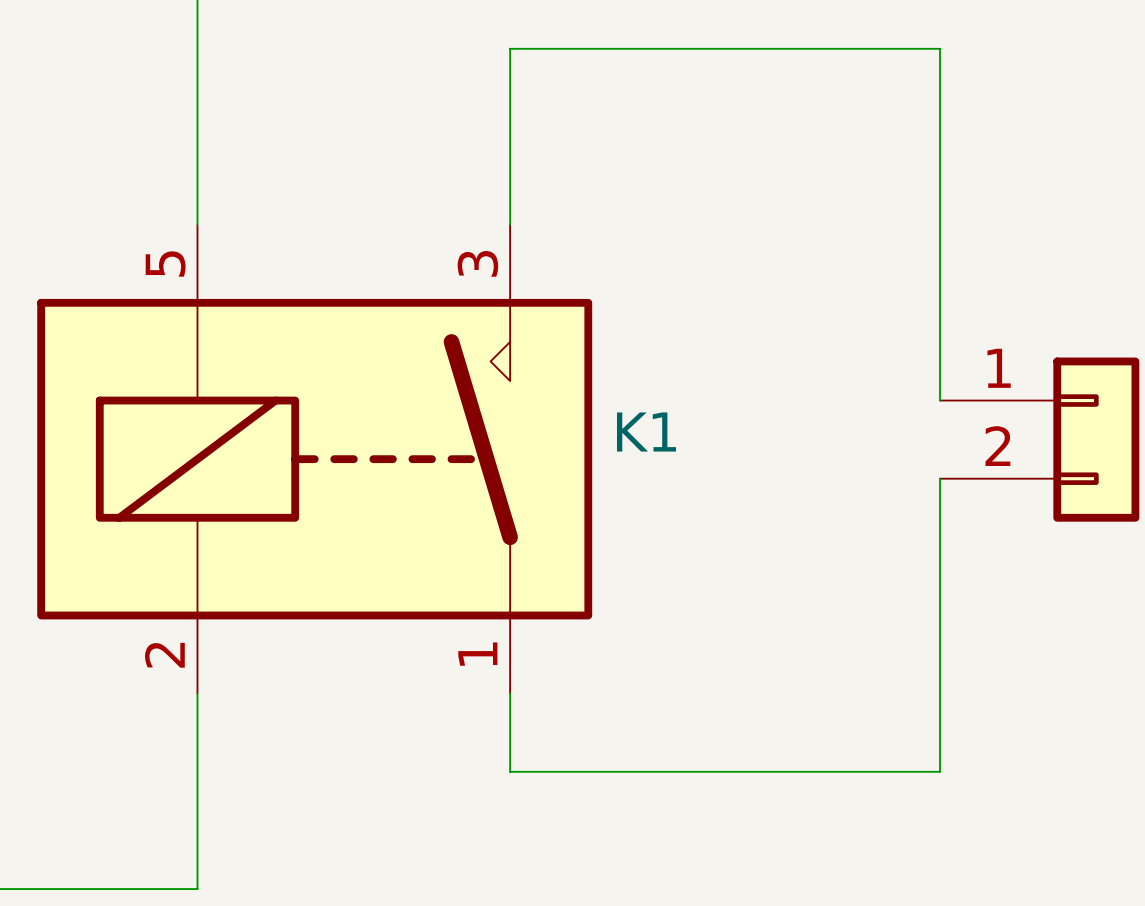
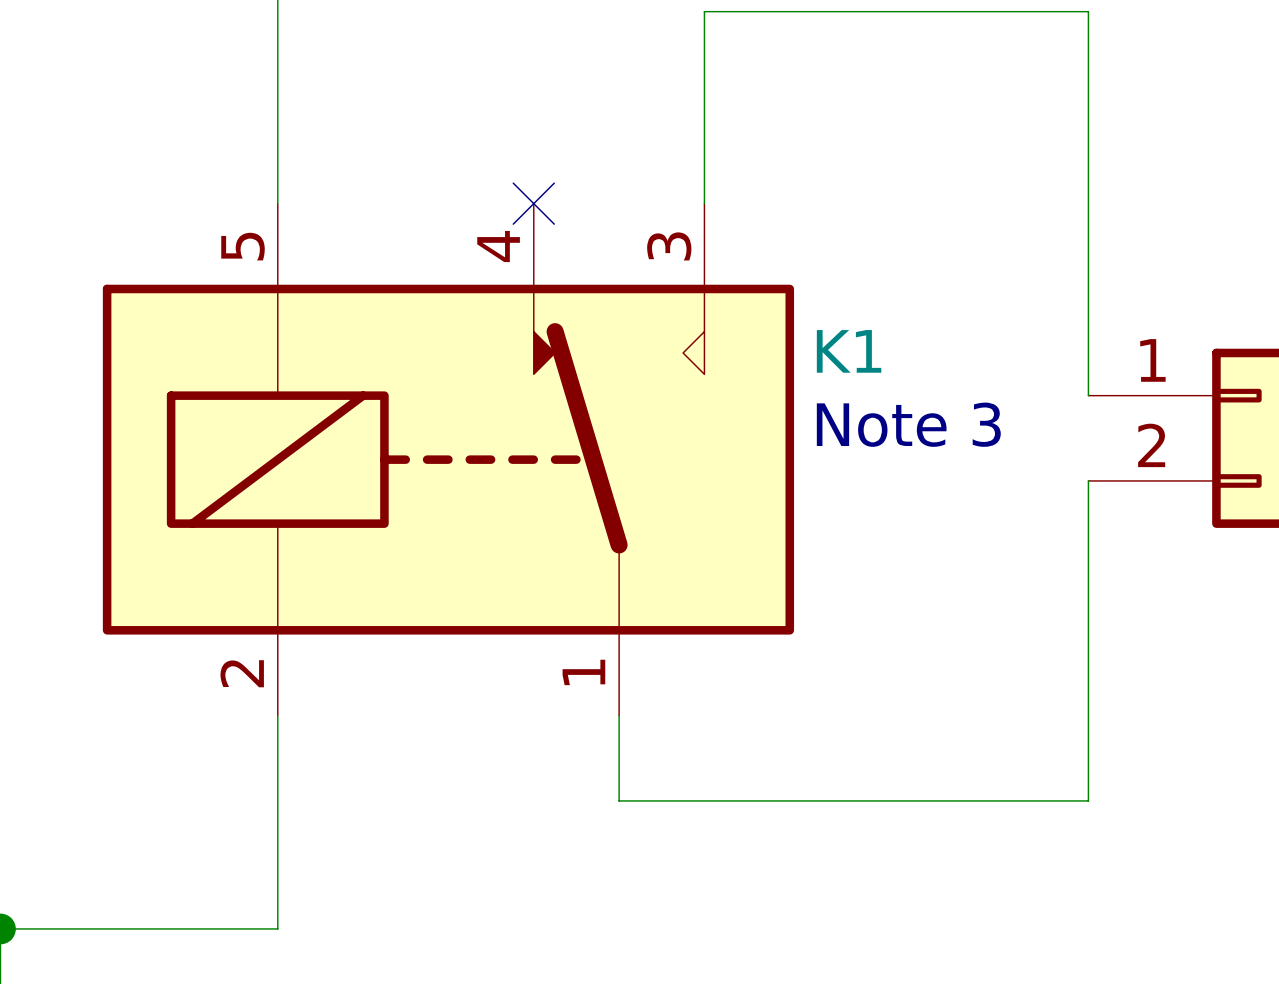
wire: (588, 48) (510, 48) (510, 224) -> (704, 11) (704, 203)
K1 symbol: [37, 224, 593, 694] -> [102, 203, 795, 716]
no-connect mark: none -> (533, 203)
text: none -> Note 3 (908, 424)
K1 name position: K1 (646, 432) -> K1 (849, 351)

